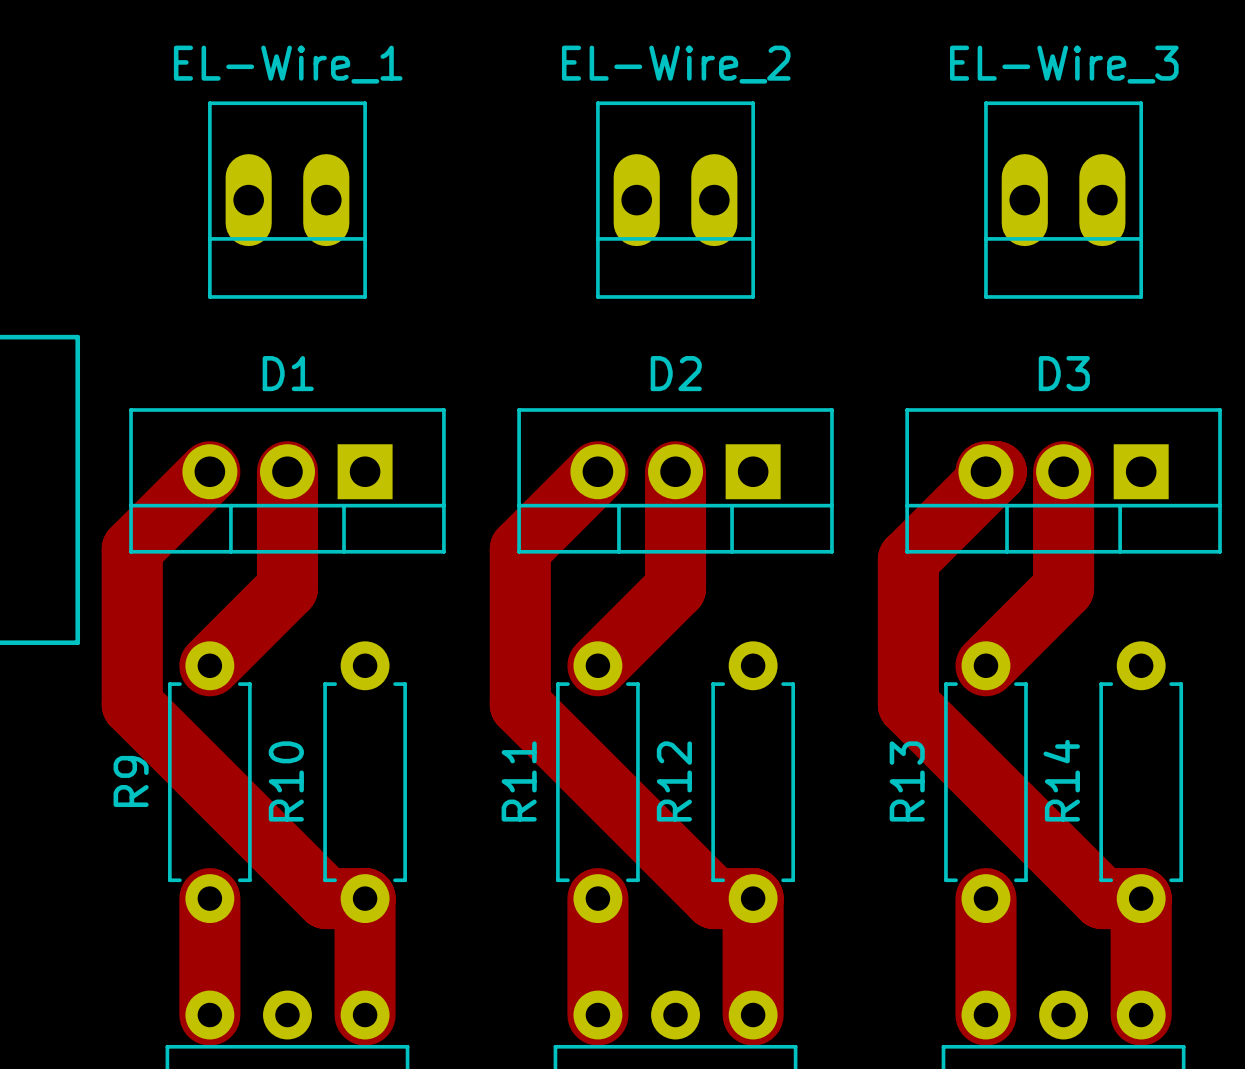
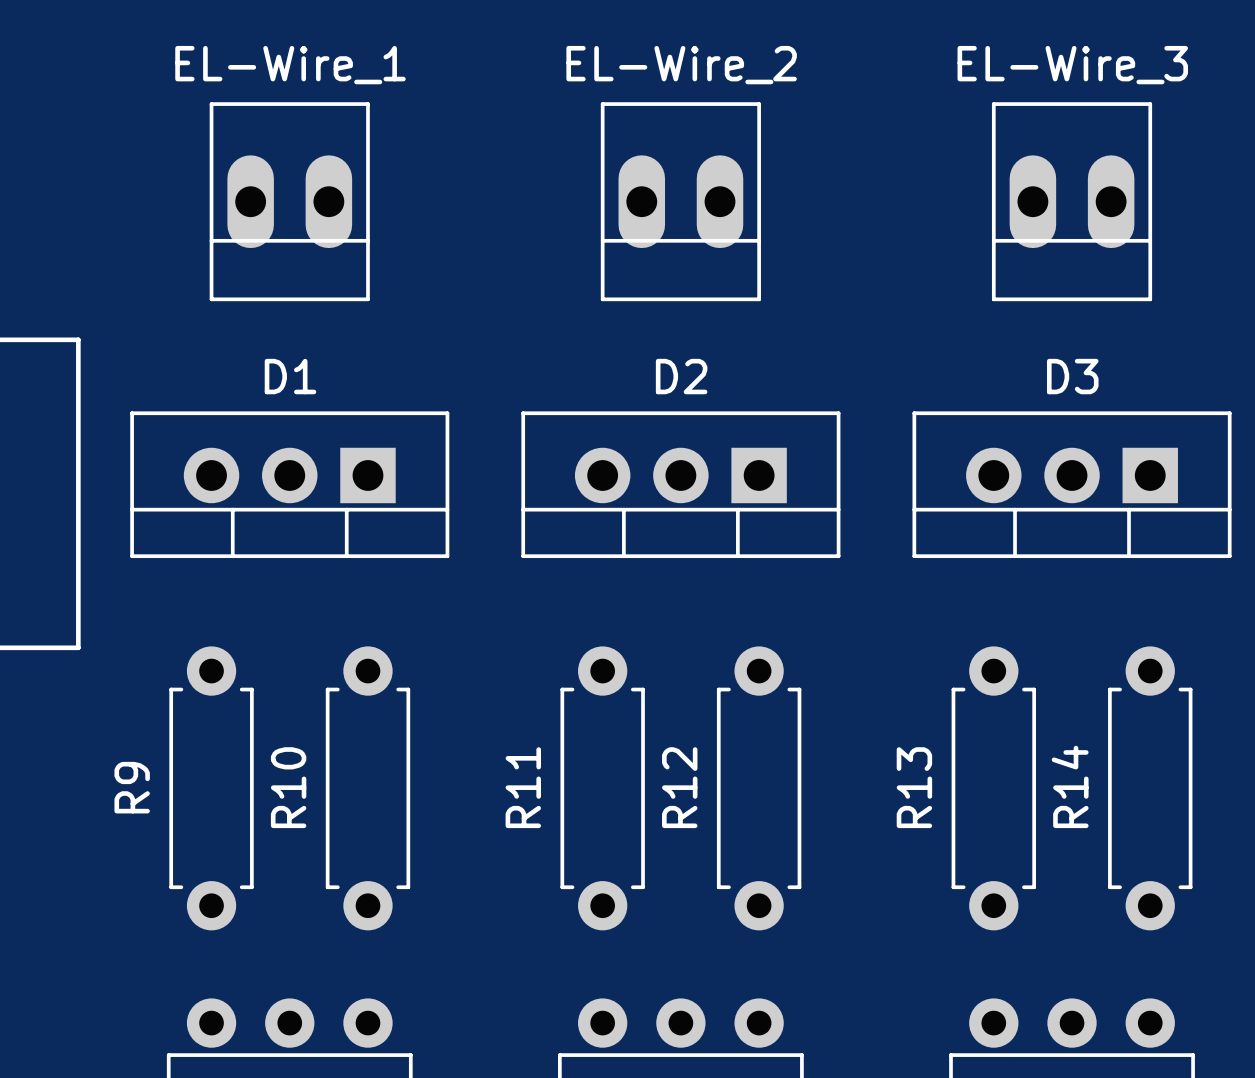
track: (209, 471) (132, 549) (132, 704) (326, 898) (365, 898) (365, 1015) -> none
track: (287, 471) (287, 588) (209, 665) -> none
track: (597, 471) (520, 549) (520, 704) (714, 898) (753, 898) (753, 1015) -> none
track: (675, 471) (675, 588) (597, 665) -> none
track: (985, 471) (996, 471) (908, 559) (908, 704) (1102, 898) (1141, 898) (1141, 1015) -> none
track: (1063, 471) (1063, 588) (985, 665) -> none
track: (209, 898) (209, 1015) -> none
track: (597, 898) (597, 1015) -> none
track: (985, 898) (985, 1015) -> none

